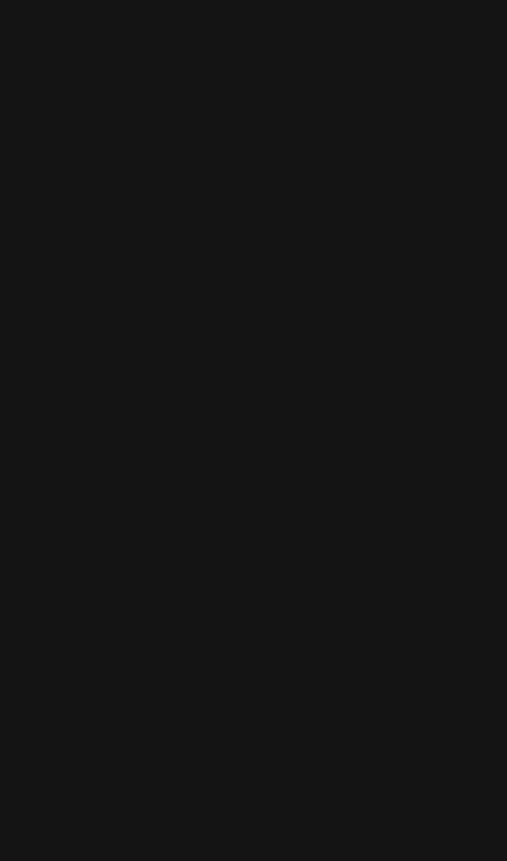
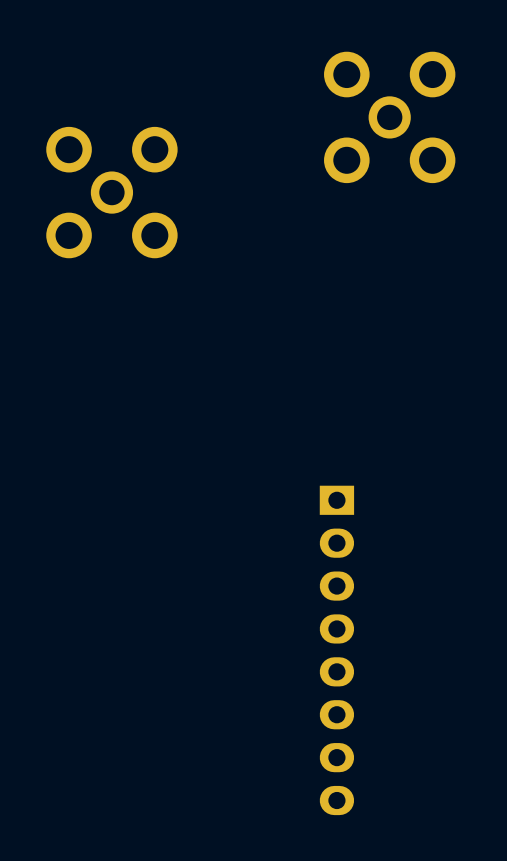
part: none -> (389, 117)
part: none -> (111, 192)
part: none -> (336, 650)

